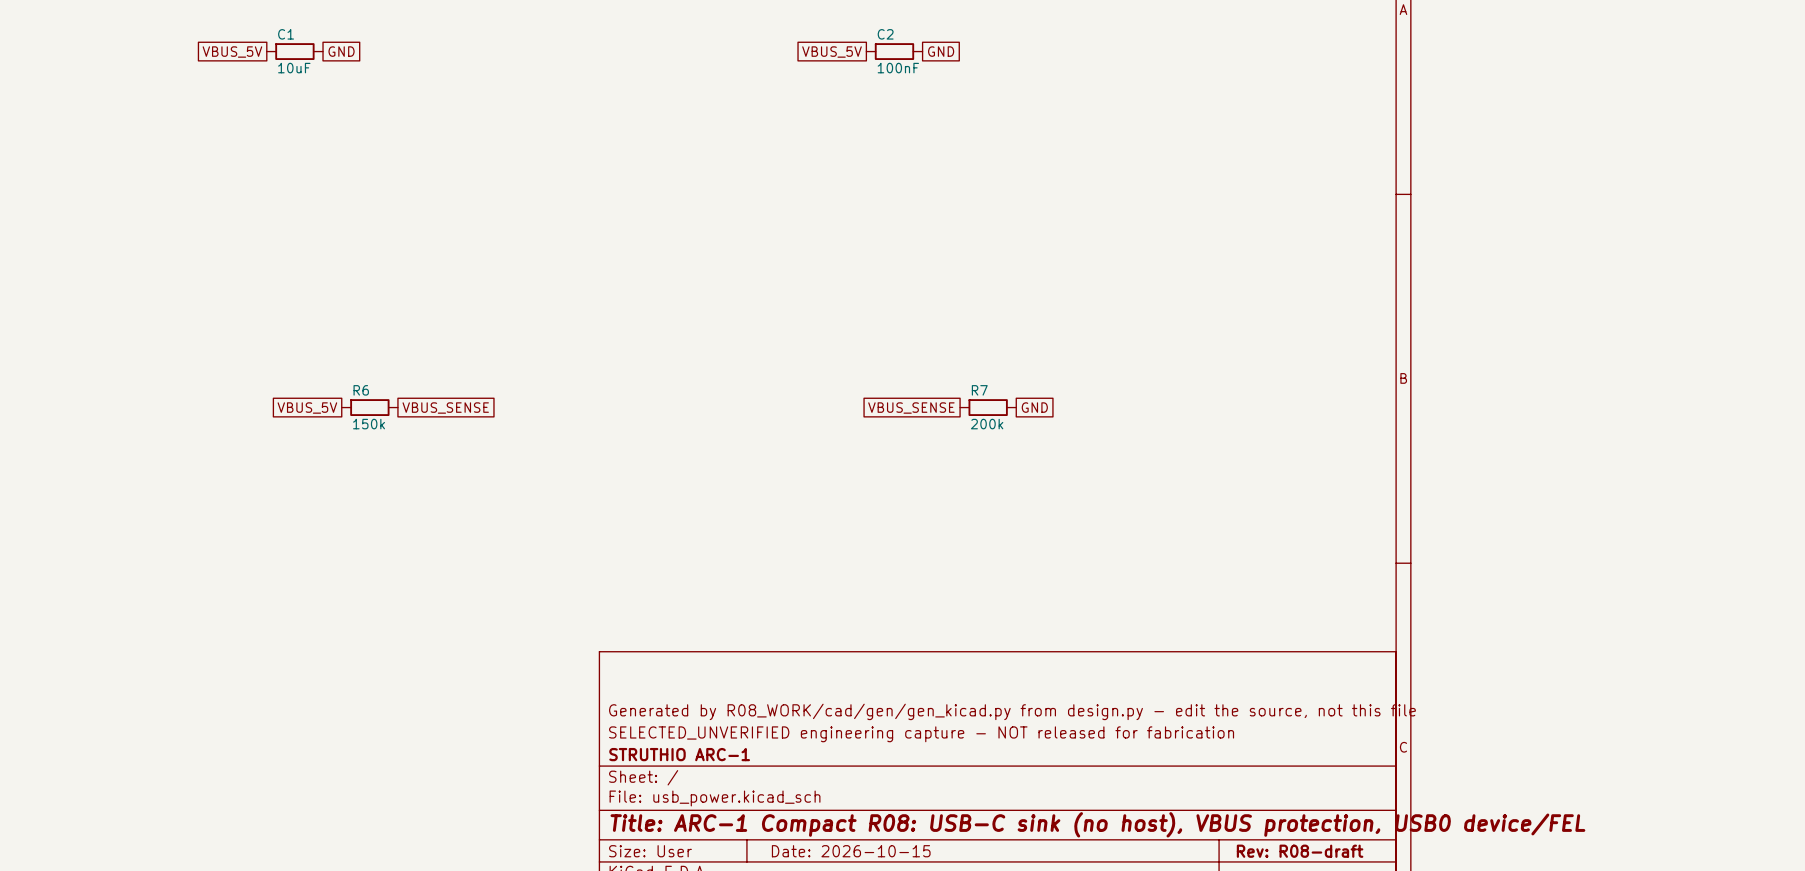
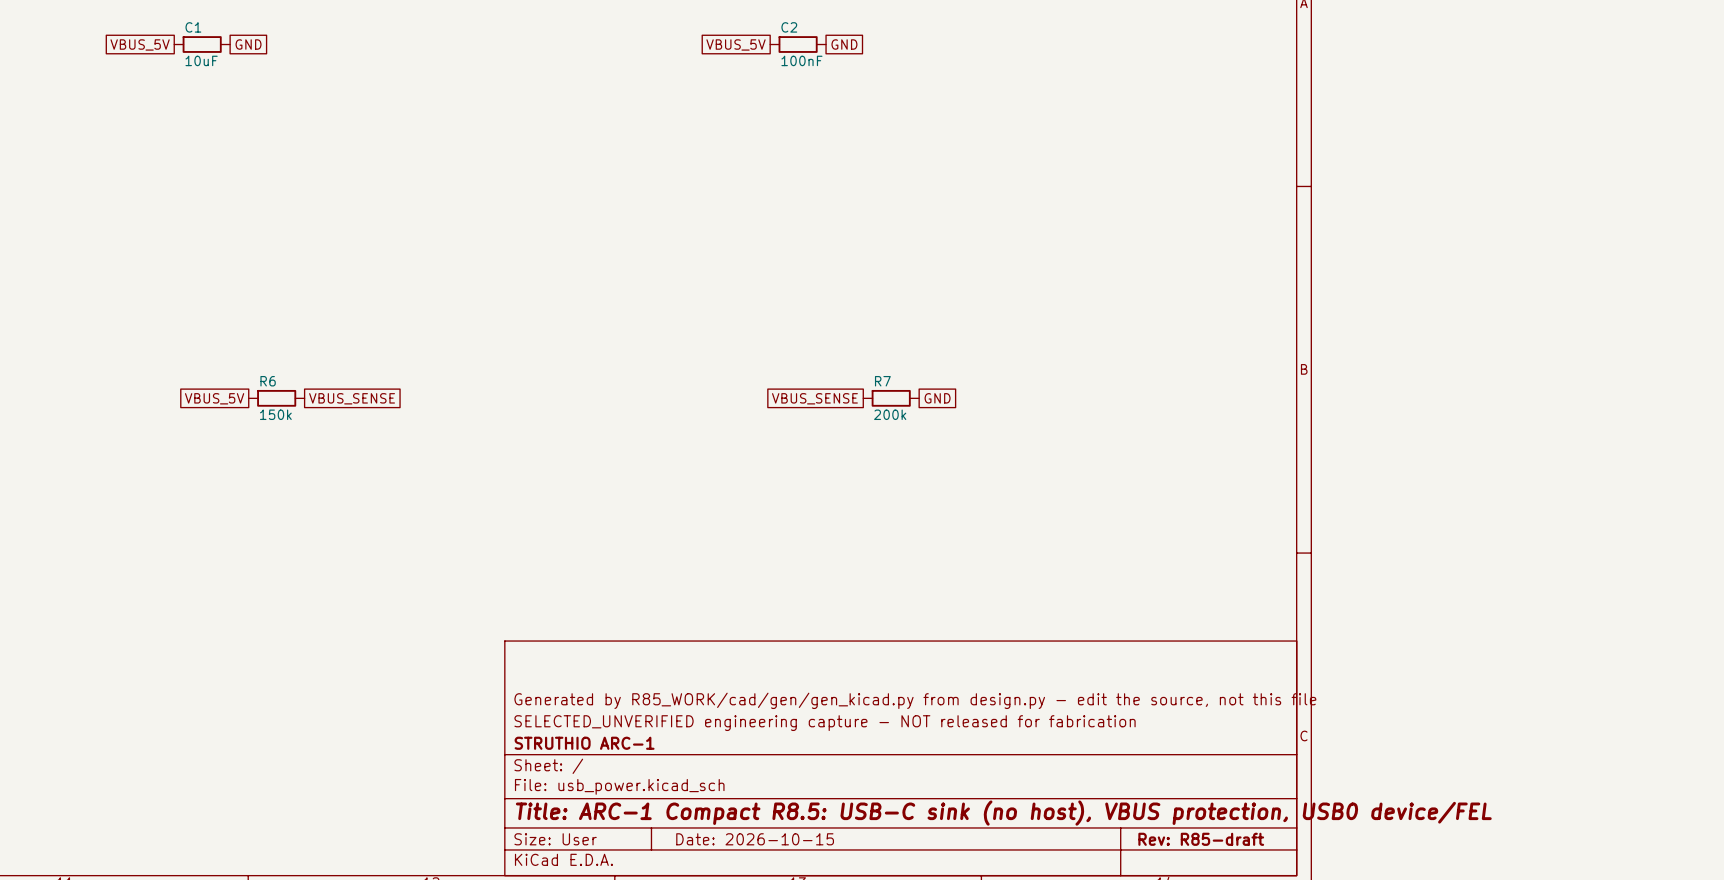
title block: Generated by R08_WORK/cad/gen/gen_kicad.py from design.py - edit the source, not this file (1012, 711) -> Generated by R85_WORK/cad/gen/gen_kicad.py from design.py - edit the source, not this file (915, 700)
title block: Title: ARC-1 Compact R08: USB-C sink (no host), VBUS protection, USB0 device/FEL (1097, 824) -> Title: ARC-1 Compact R8.5: USB-C sink (no host), VBUS protection, USB0 device/FEL (1003, 813)
title block: Rev: R08-draft (1300, 851) -> Rev: R85-draft (1201, 839)

